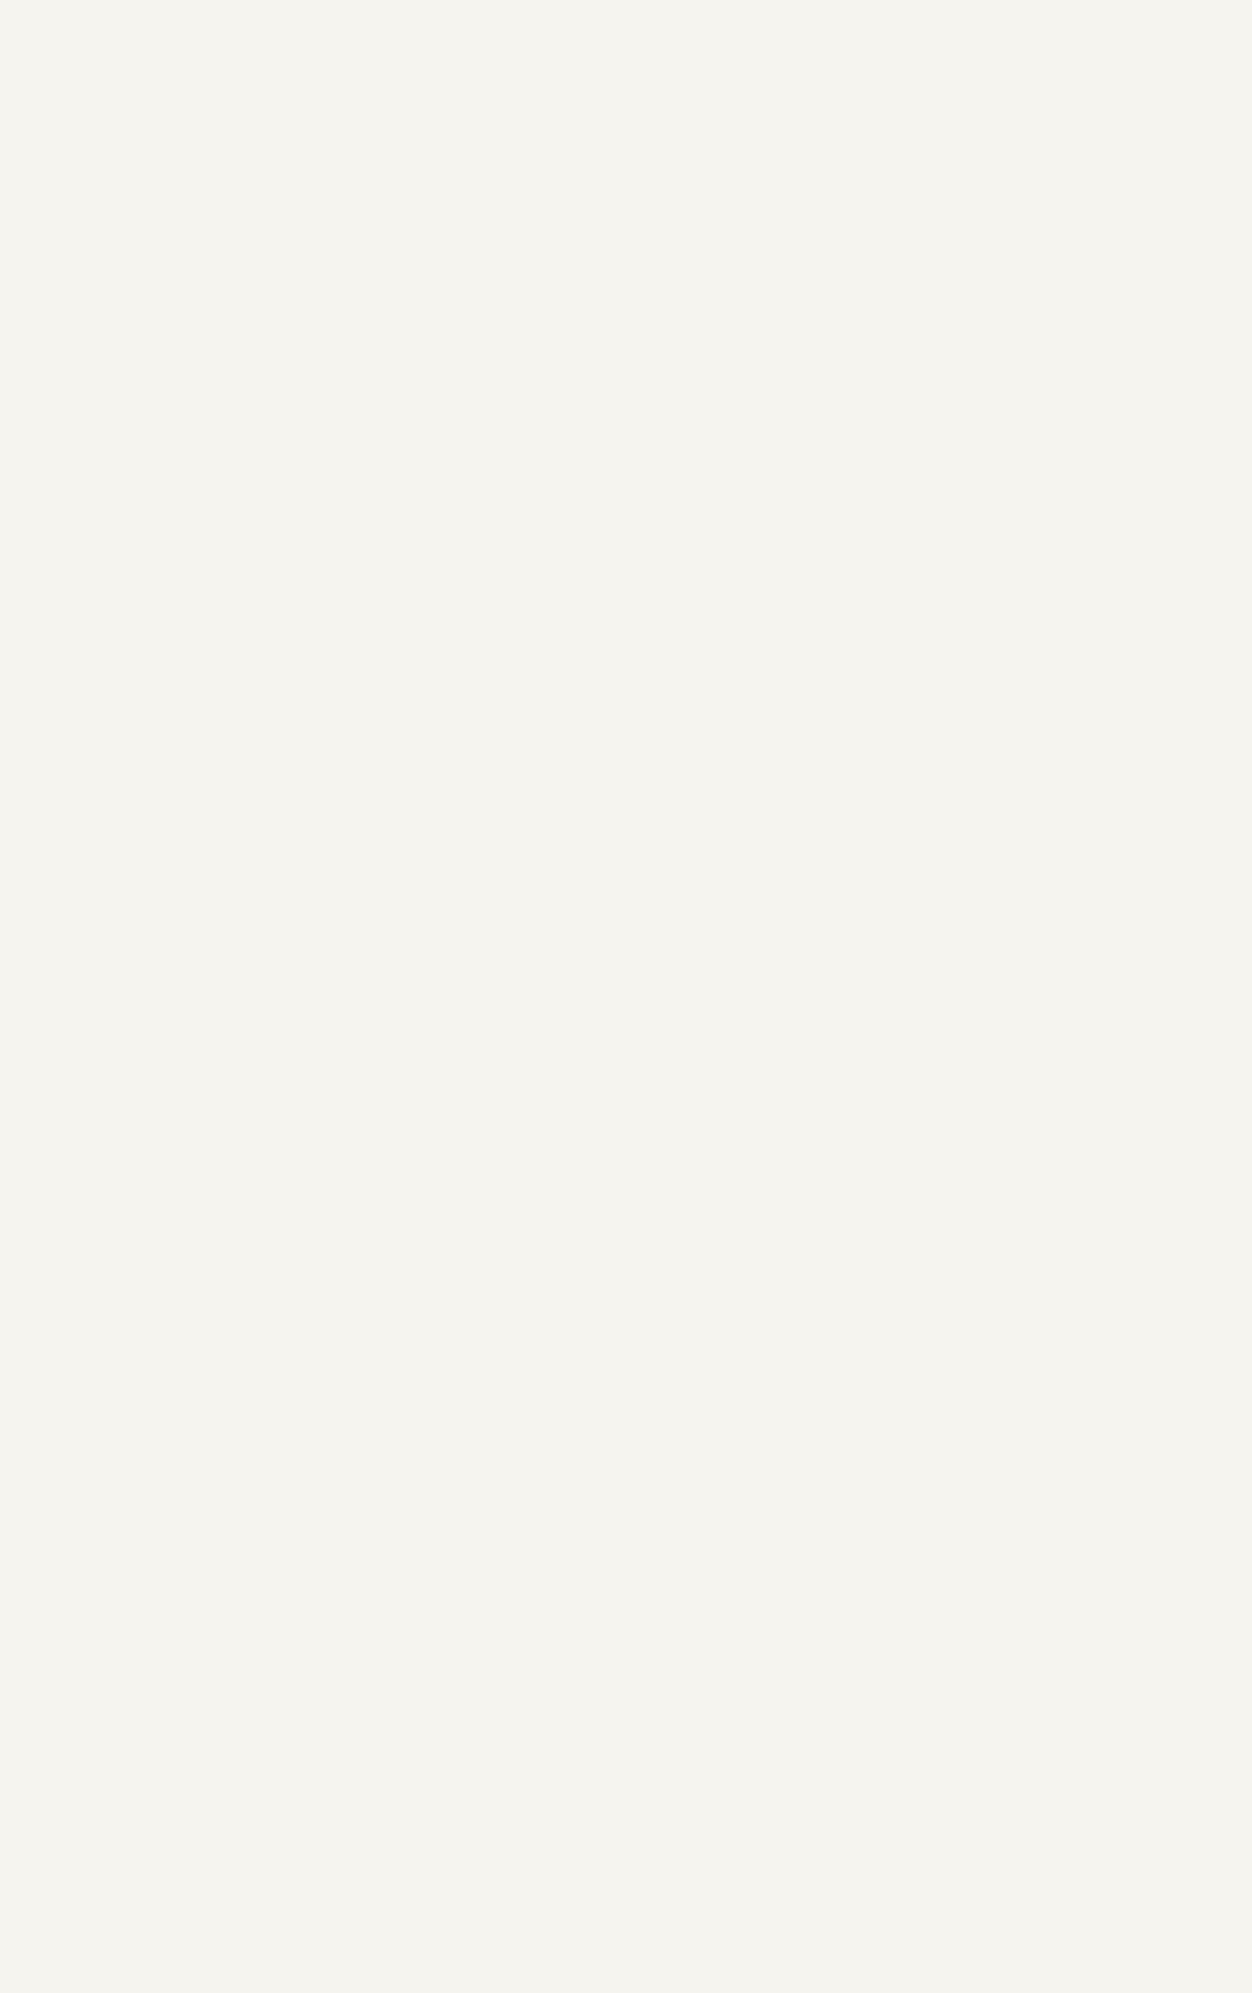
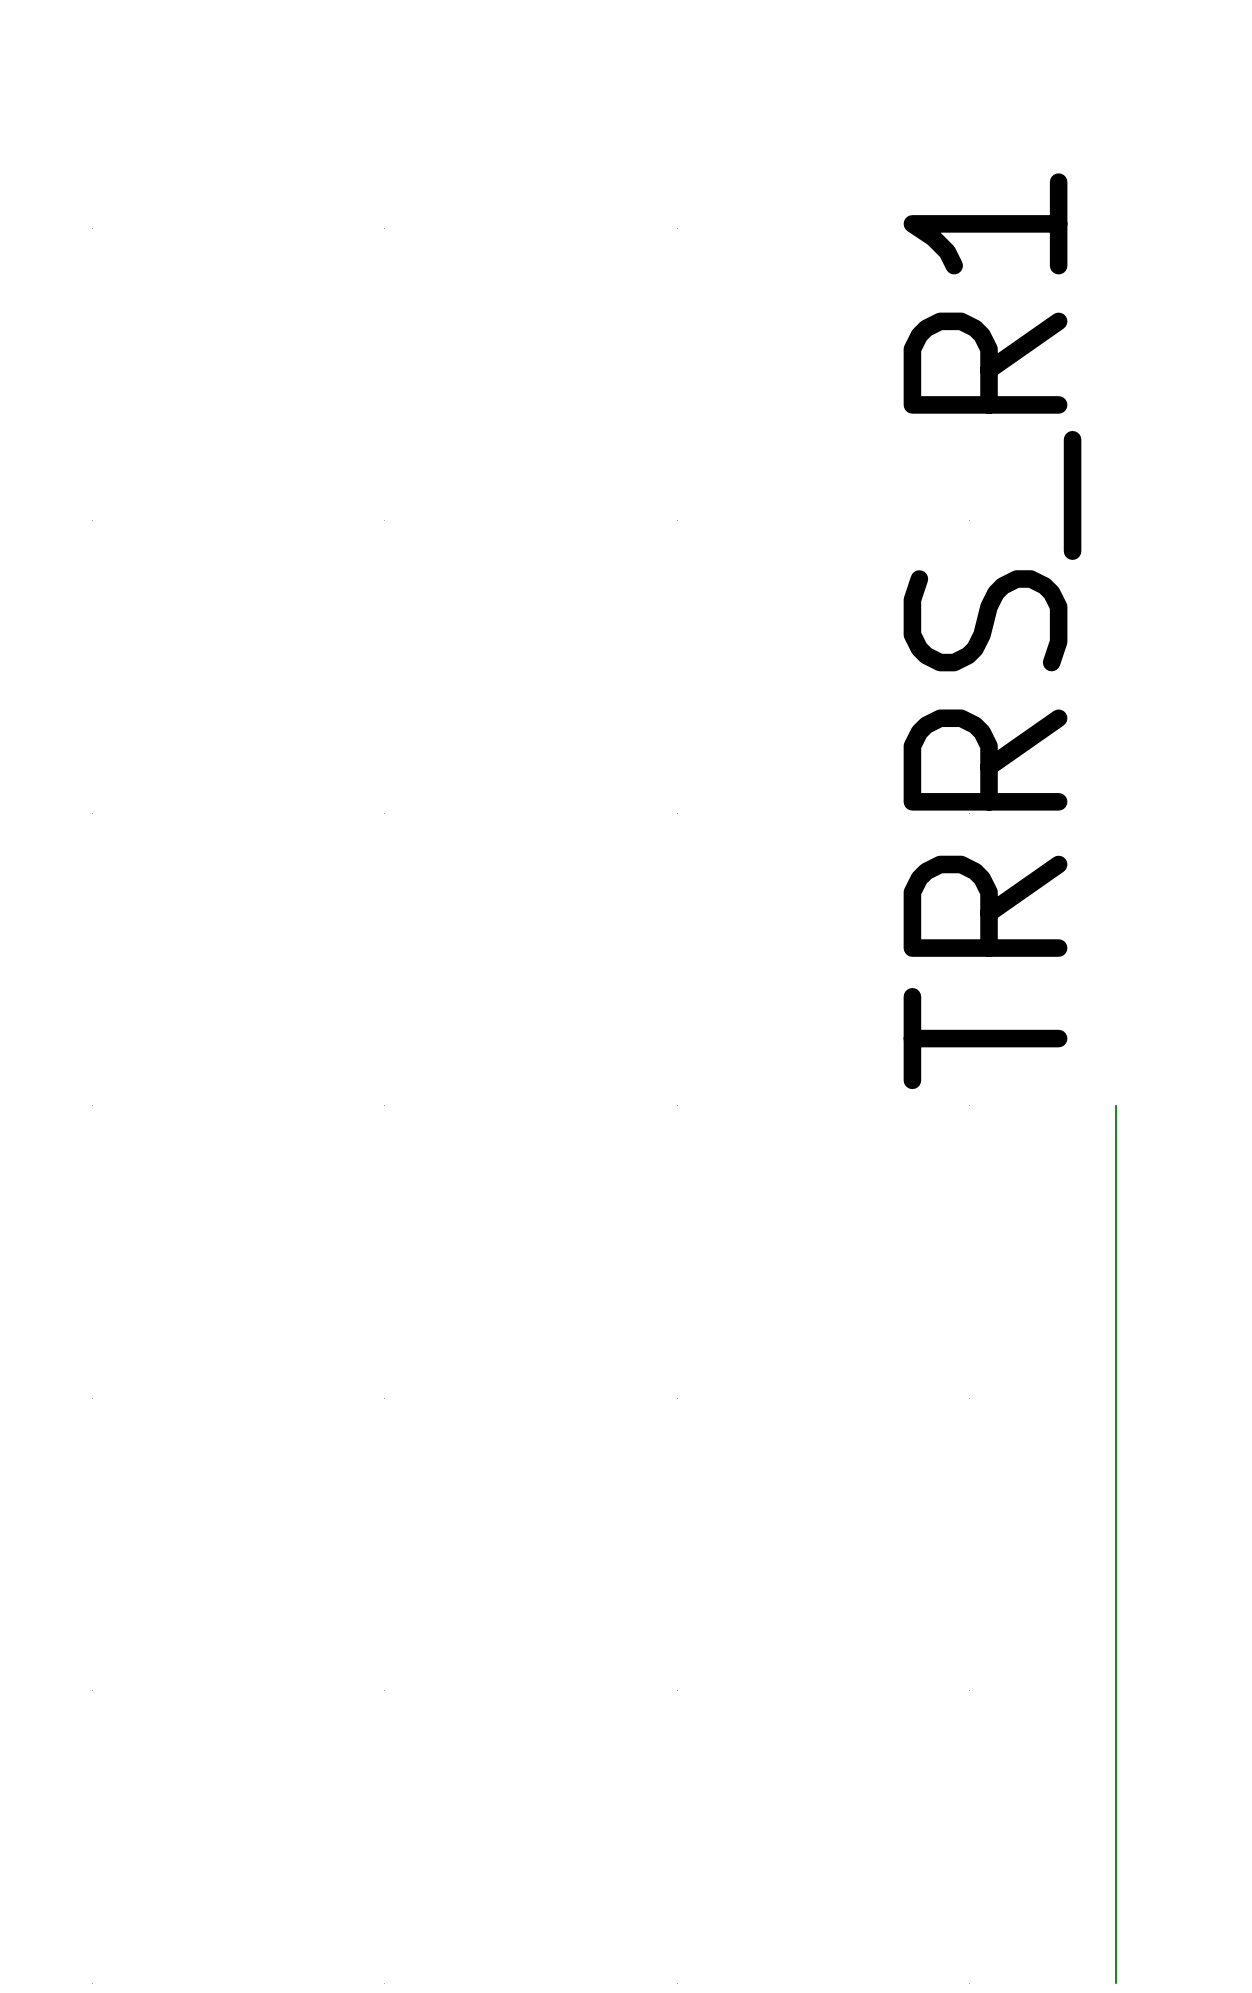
label: none -> TRRS_R1 (992, 631)
wire: none -> (1116, 1105) (1116, 1983)

